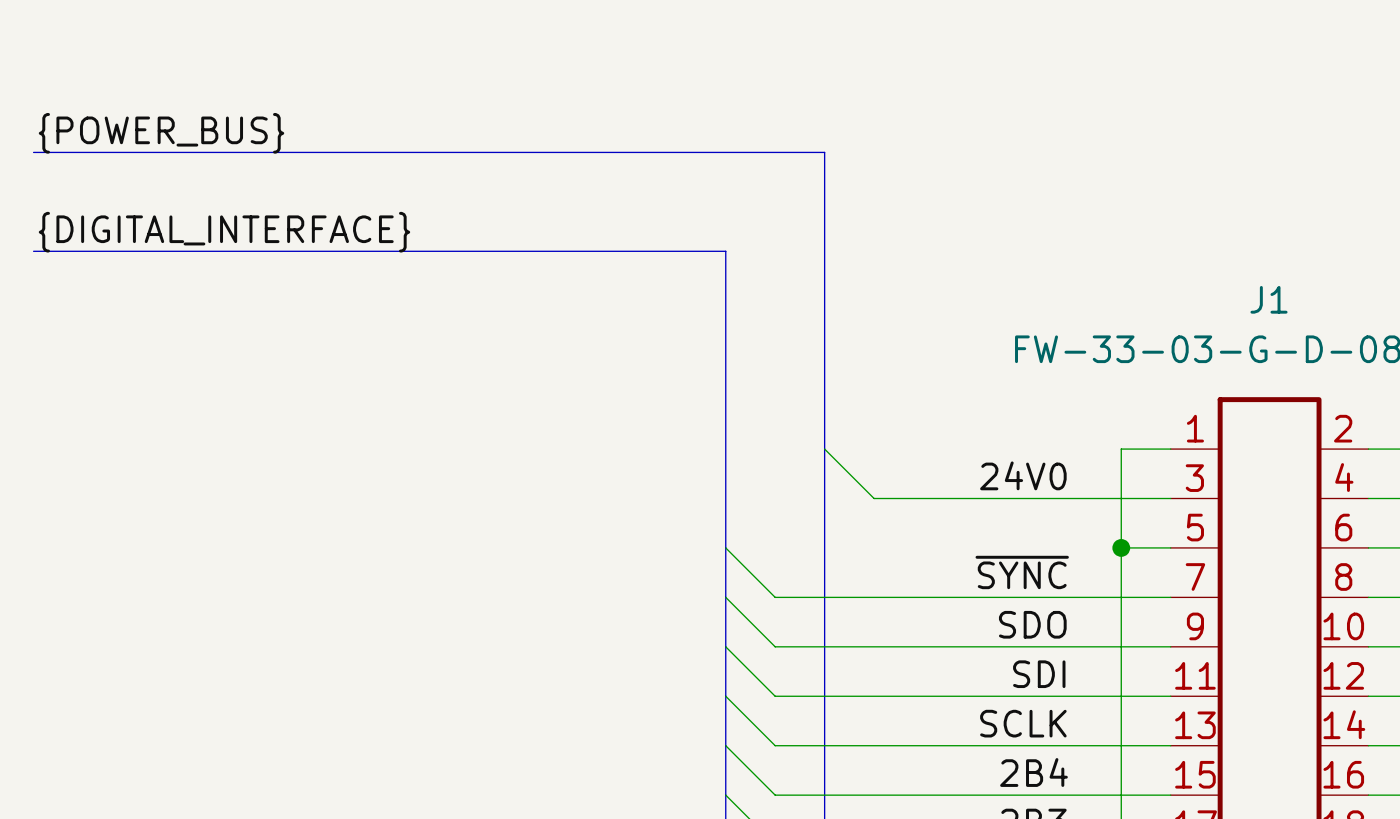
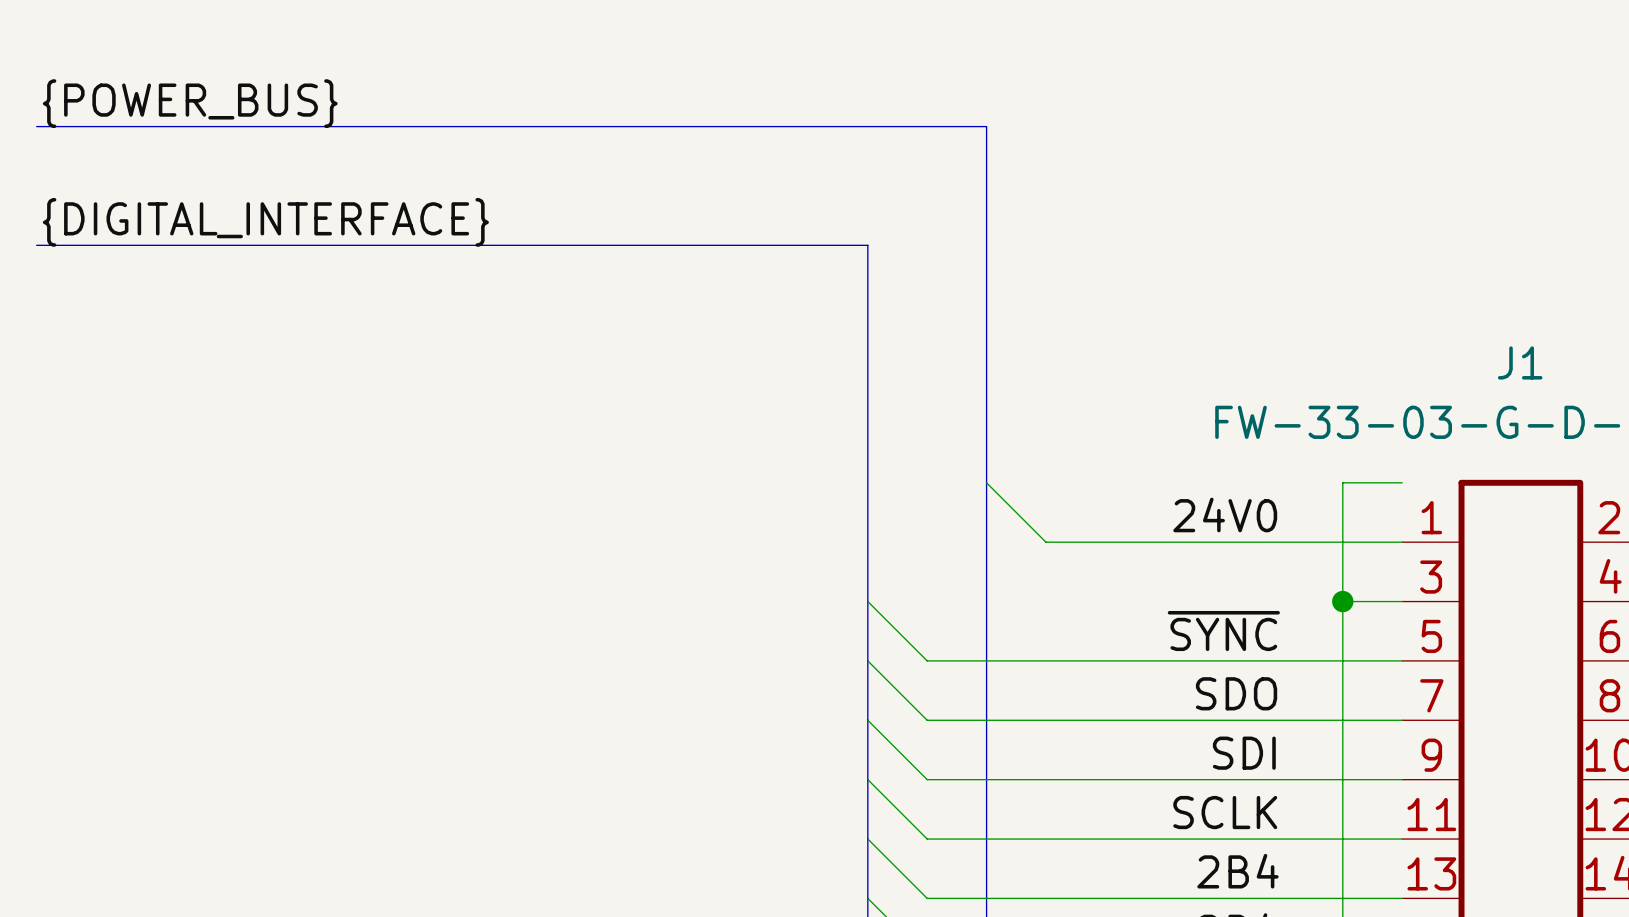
label position: {POWER_BUS} (161, 133) -> {POWER_BUS} (190, 103)
bus: (33, 152) (824, 152) -> (36, 126) (986, 126) (986, 185)
label position: {DIGITAL_INTERFACE} (224, 232) -> {DIGITAL_INTERFACE} (265, 222)
bus: (33, 251) (725, 251) -> (36, 245) (867, 245) (867, 304)
wire: none -> (986, 482) (1045, 542) (1342, 542) (1342, 482) (1402, 482)
wire: (824, 449) (874, 498) (1121, 498) -> none
label position: 24V0 (1023, 475) -> 24V0 (1225, 514)
wire: none -> (867, 601) (927, 660) (1342, 660)
label: none -> ~{SYNC} (1223, 631)
junction position: (1121, 547) -> (1342, 601)
label: ~{SYNC} (1022, 572) -> SDO (1236, 693)
label: SDO (1032, 624) -> SDI (1244, 753)
label: SDI (1039, 674) -> SCLK (1225, 812)
label: SCLK (1023, 723) -> 2B4 (1237, 871)

